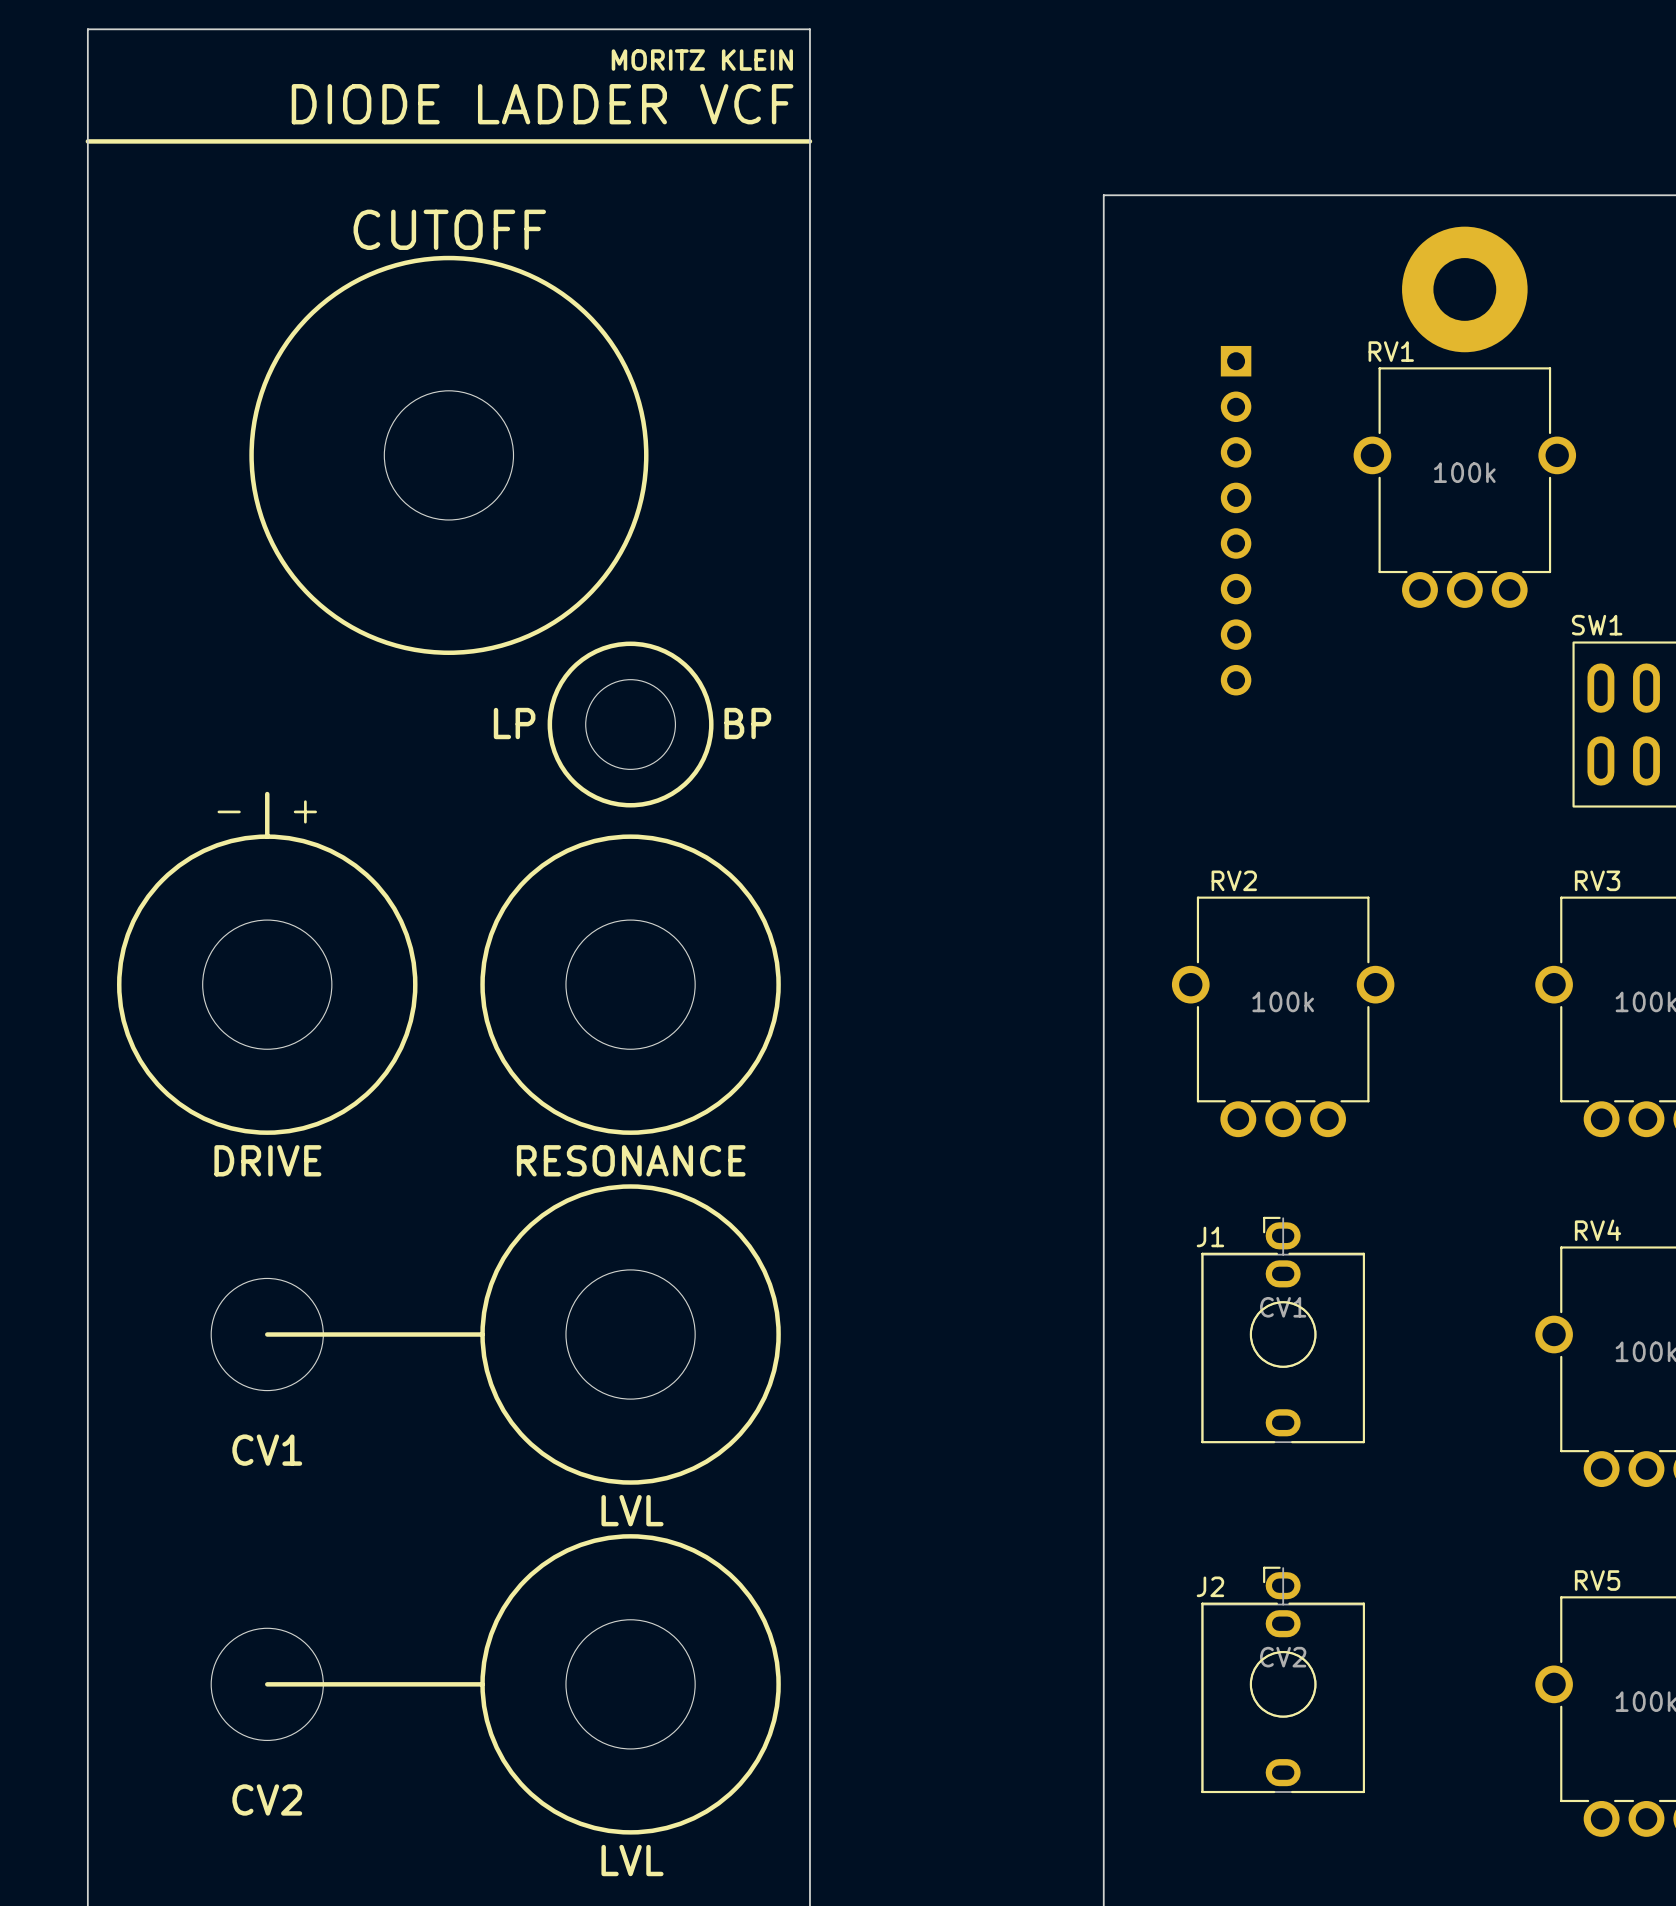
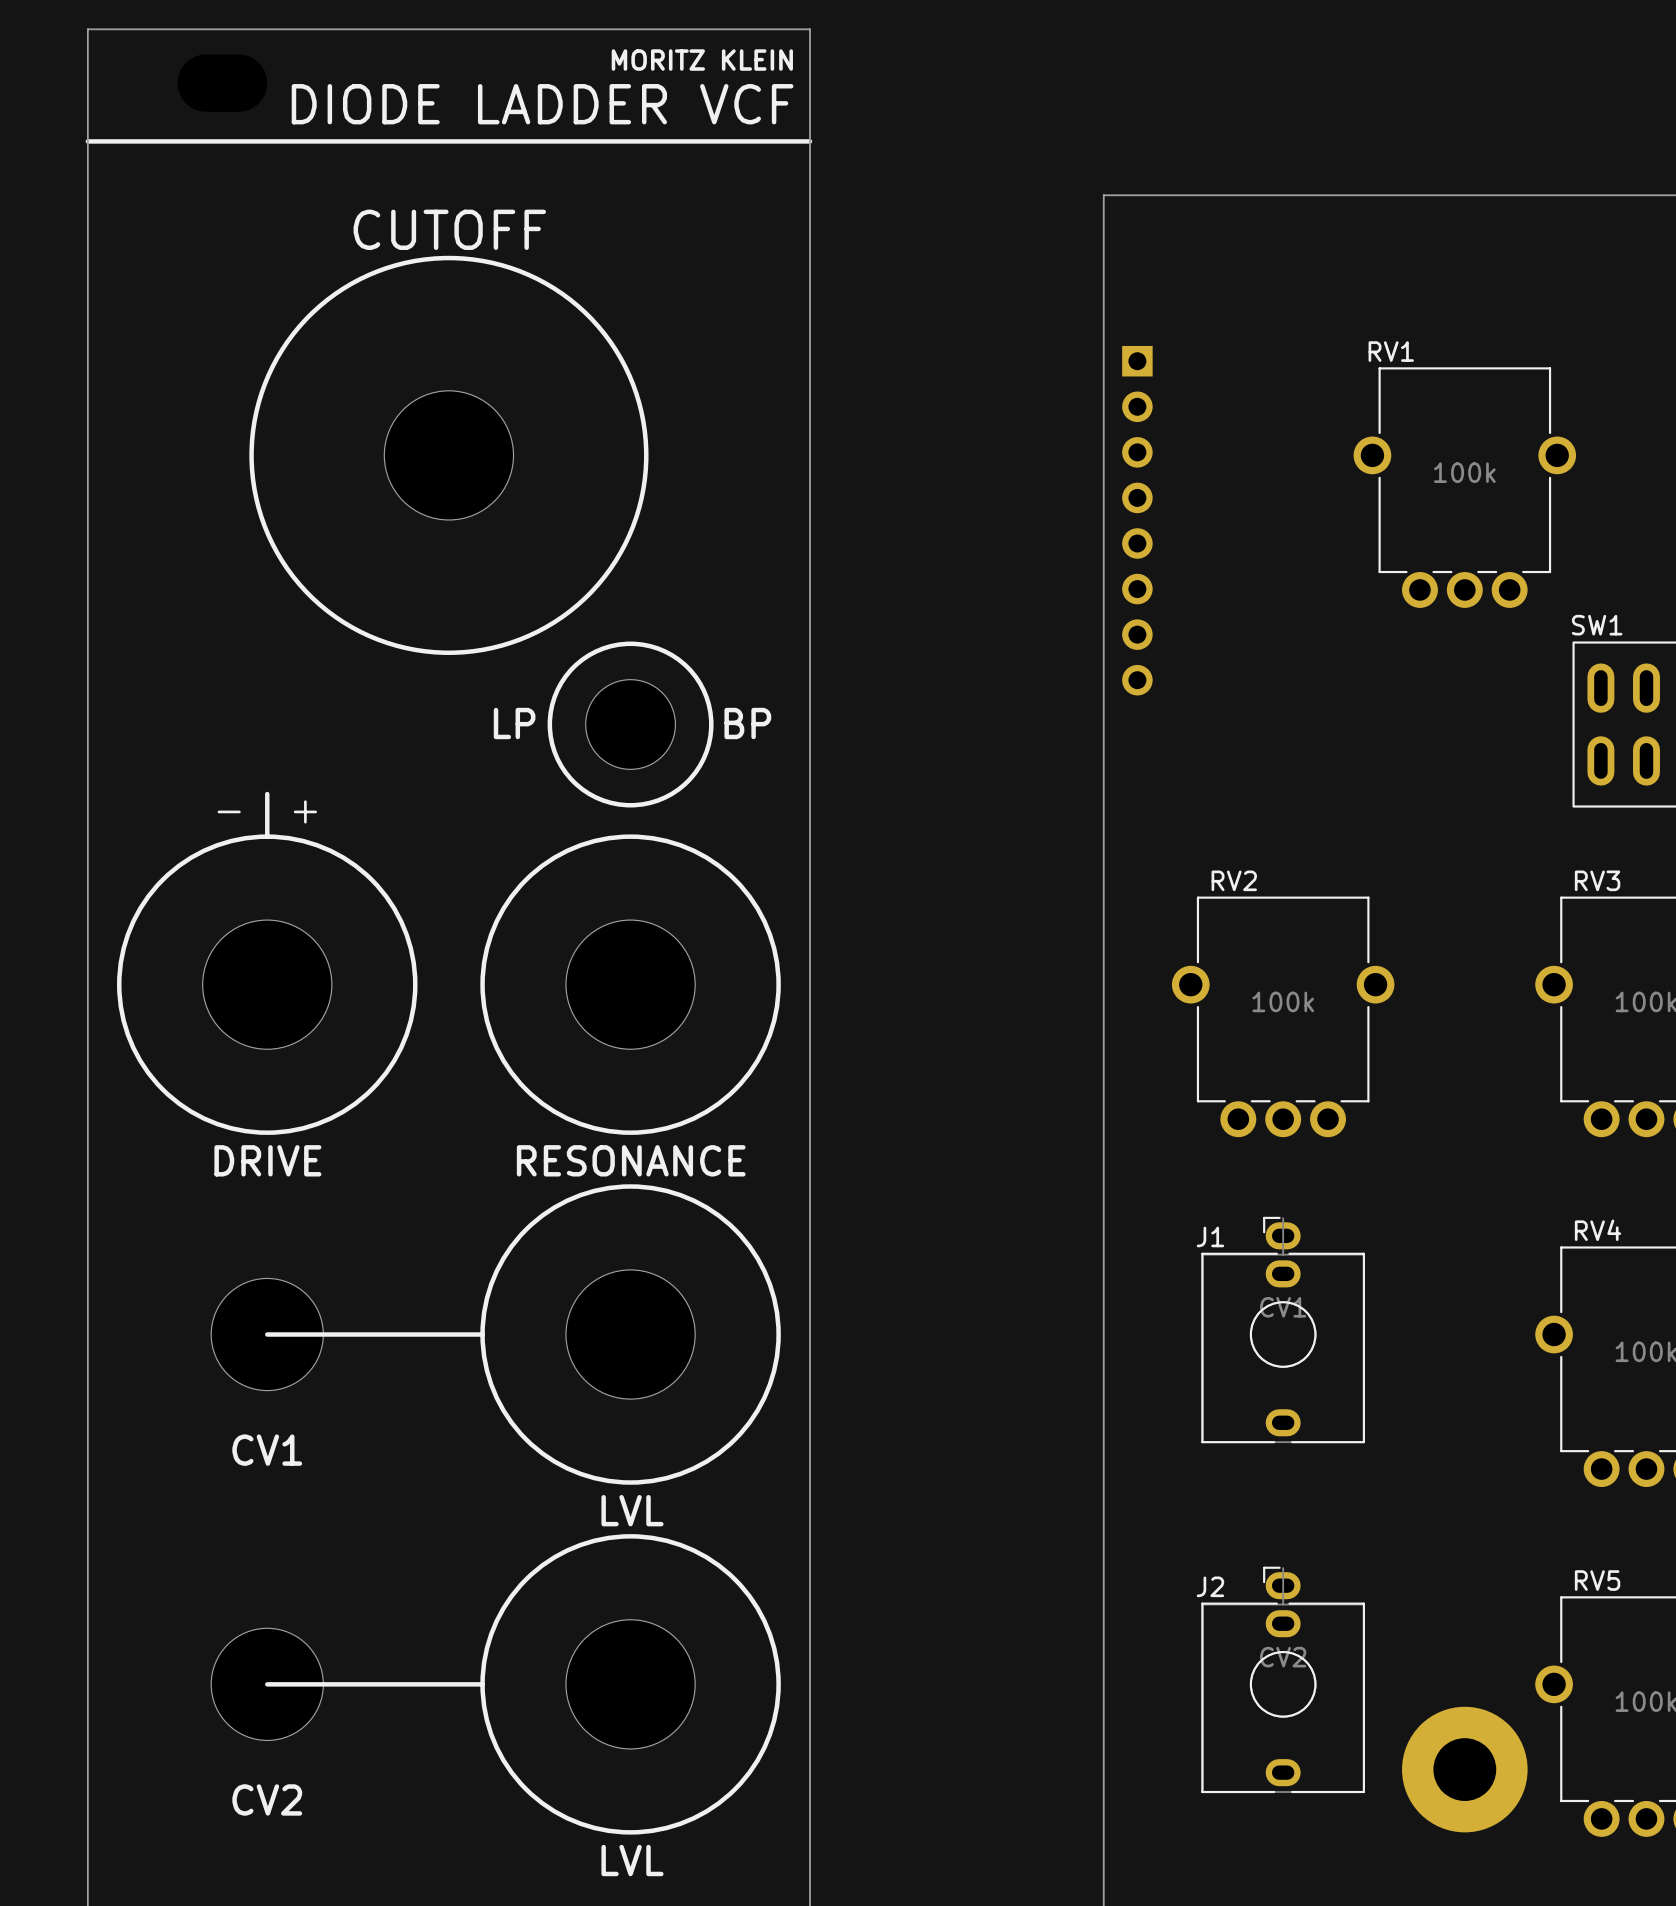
part: (1464, 289) -> none
part position: (1236, 520) -> (1137, 520)
part: none -> (1464, 1769)

